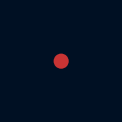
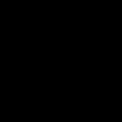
part: (61, 61) -> none

